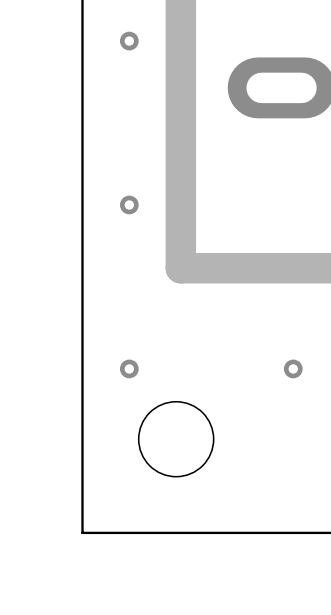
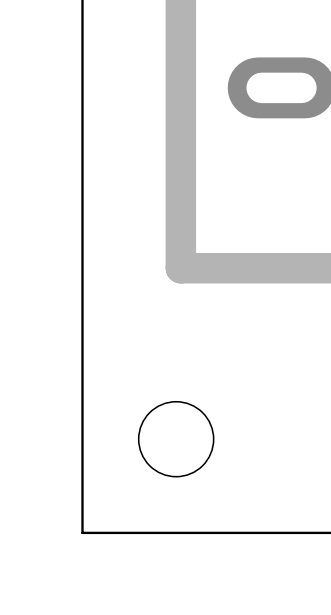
via: (129, 41) -> none
via: (129, 204) -> none
via: (129, 368) -> none
via: (293, 368) -> none

